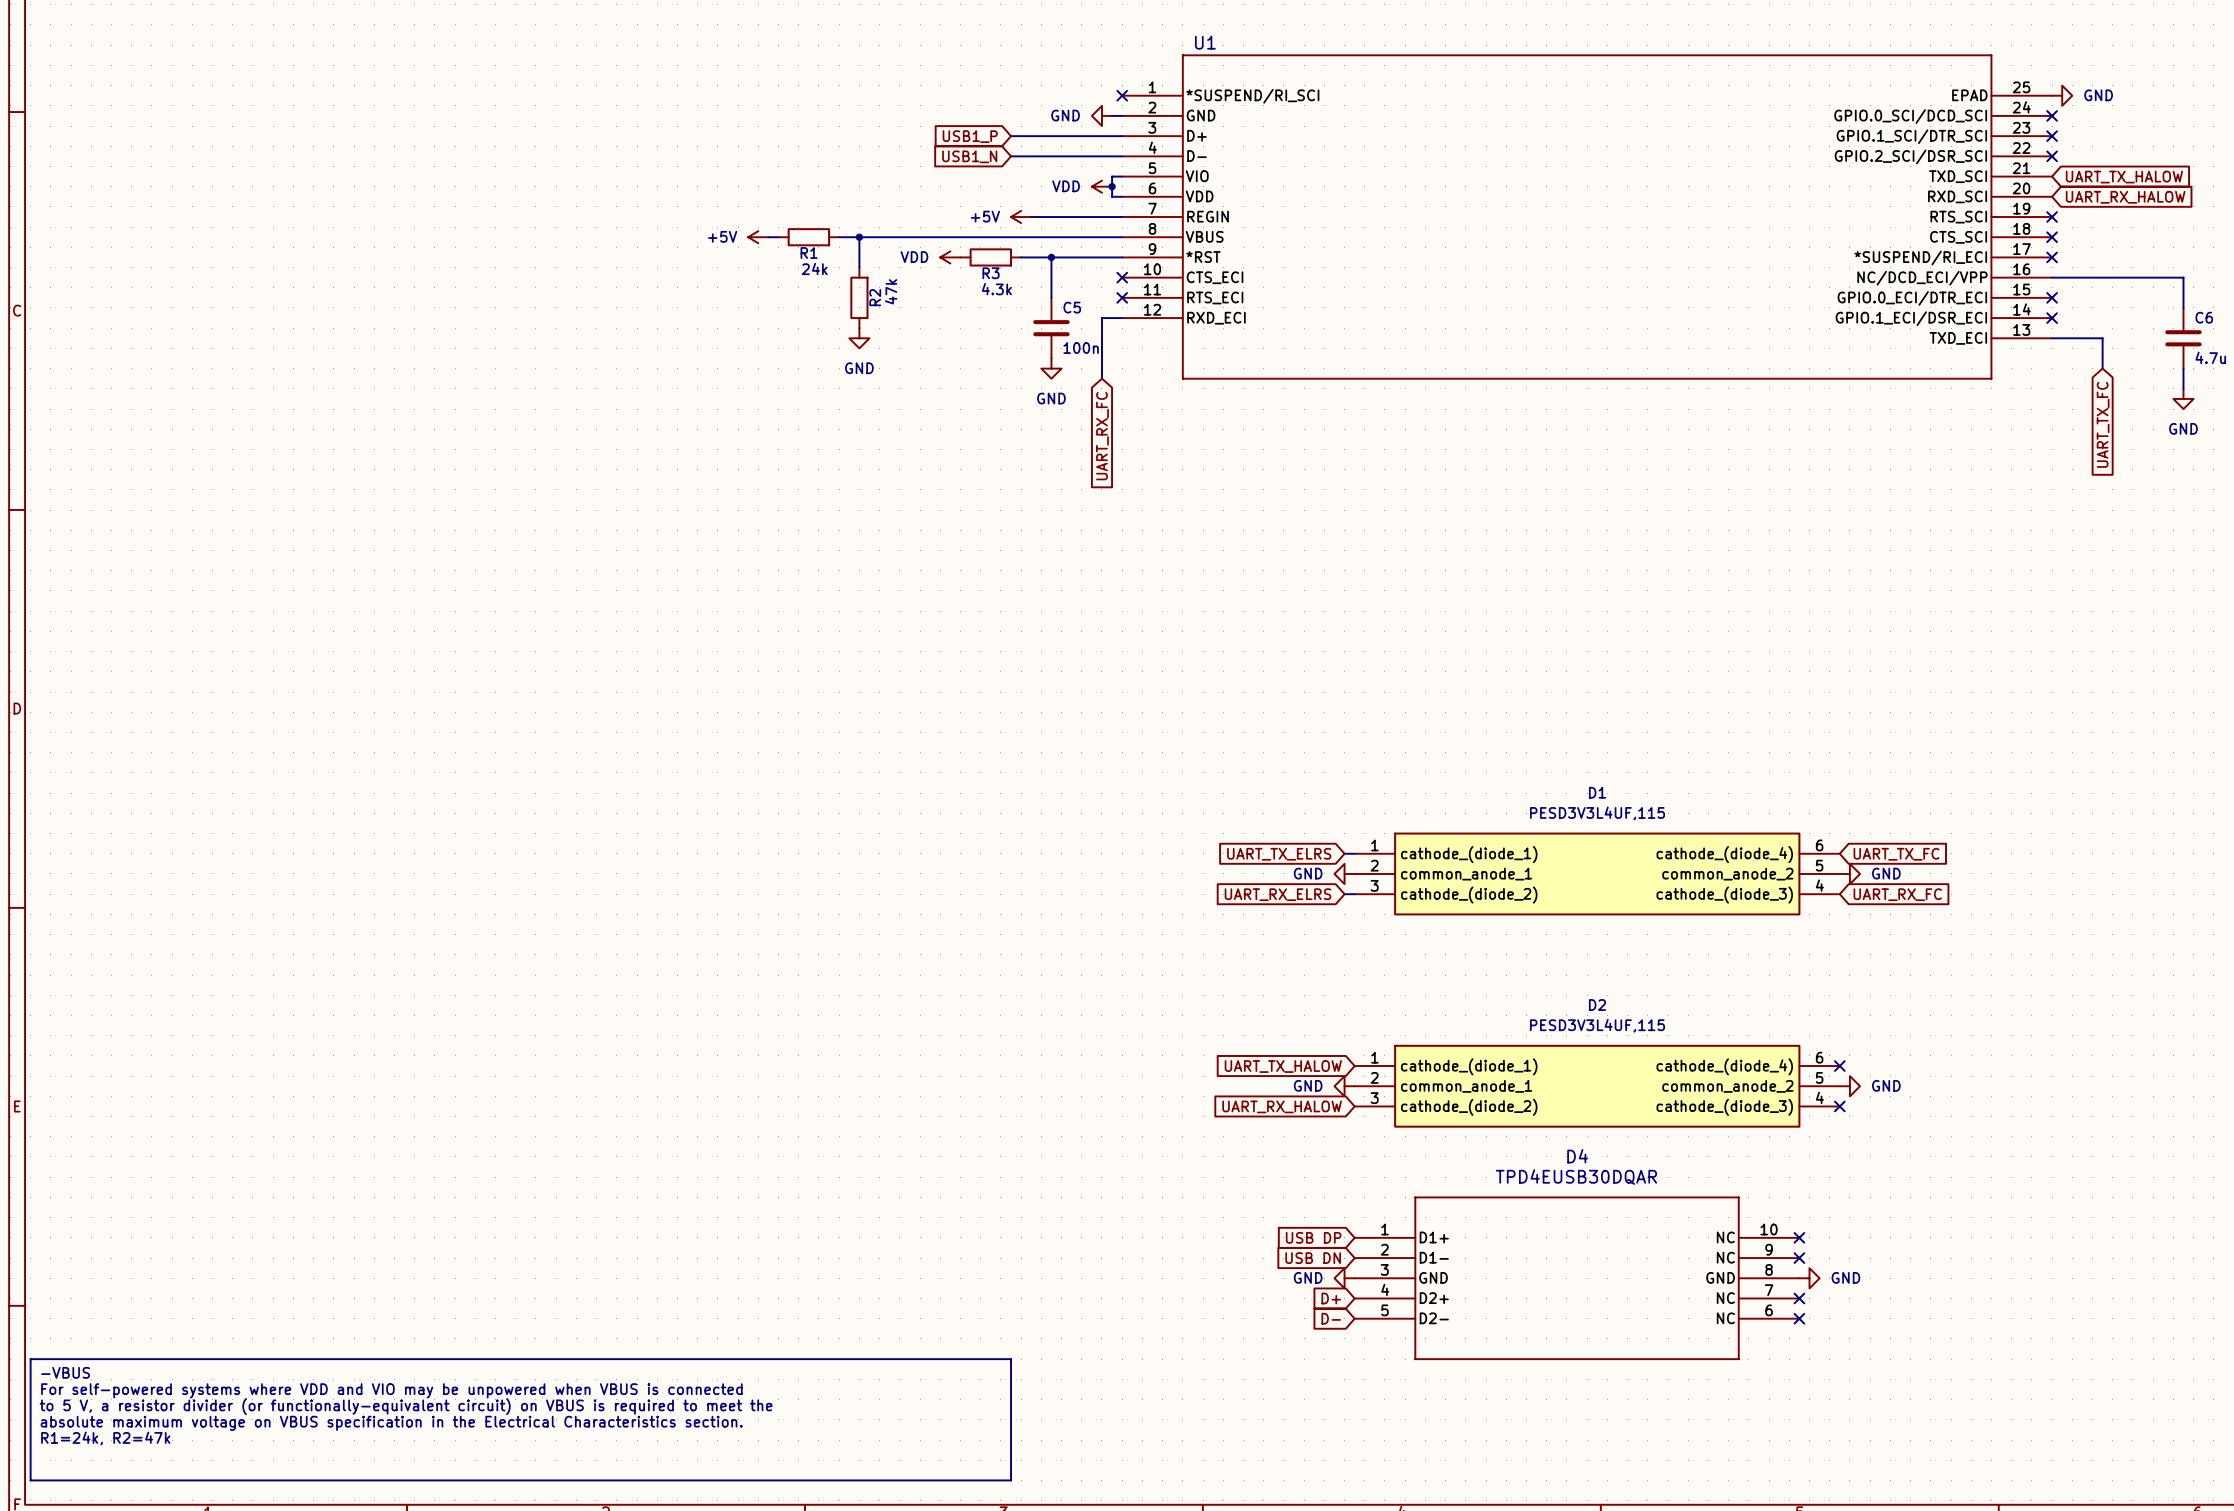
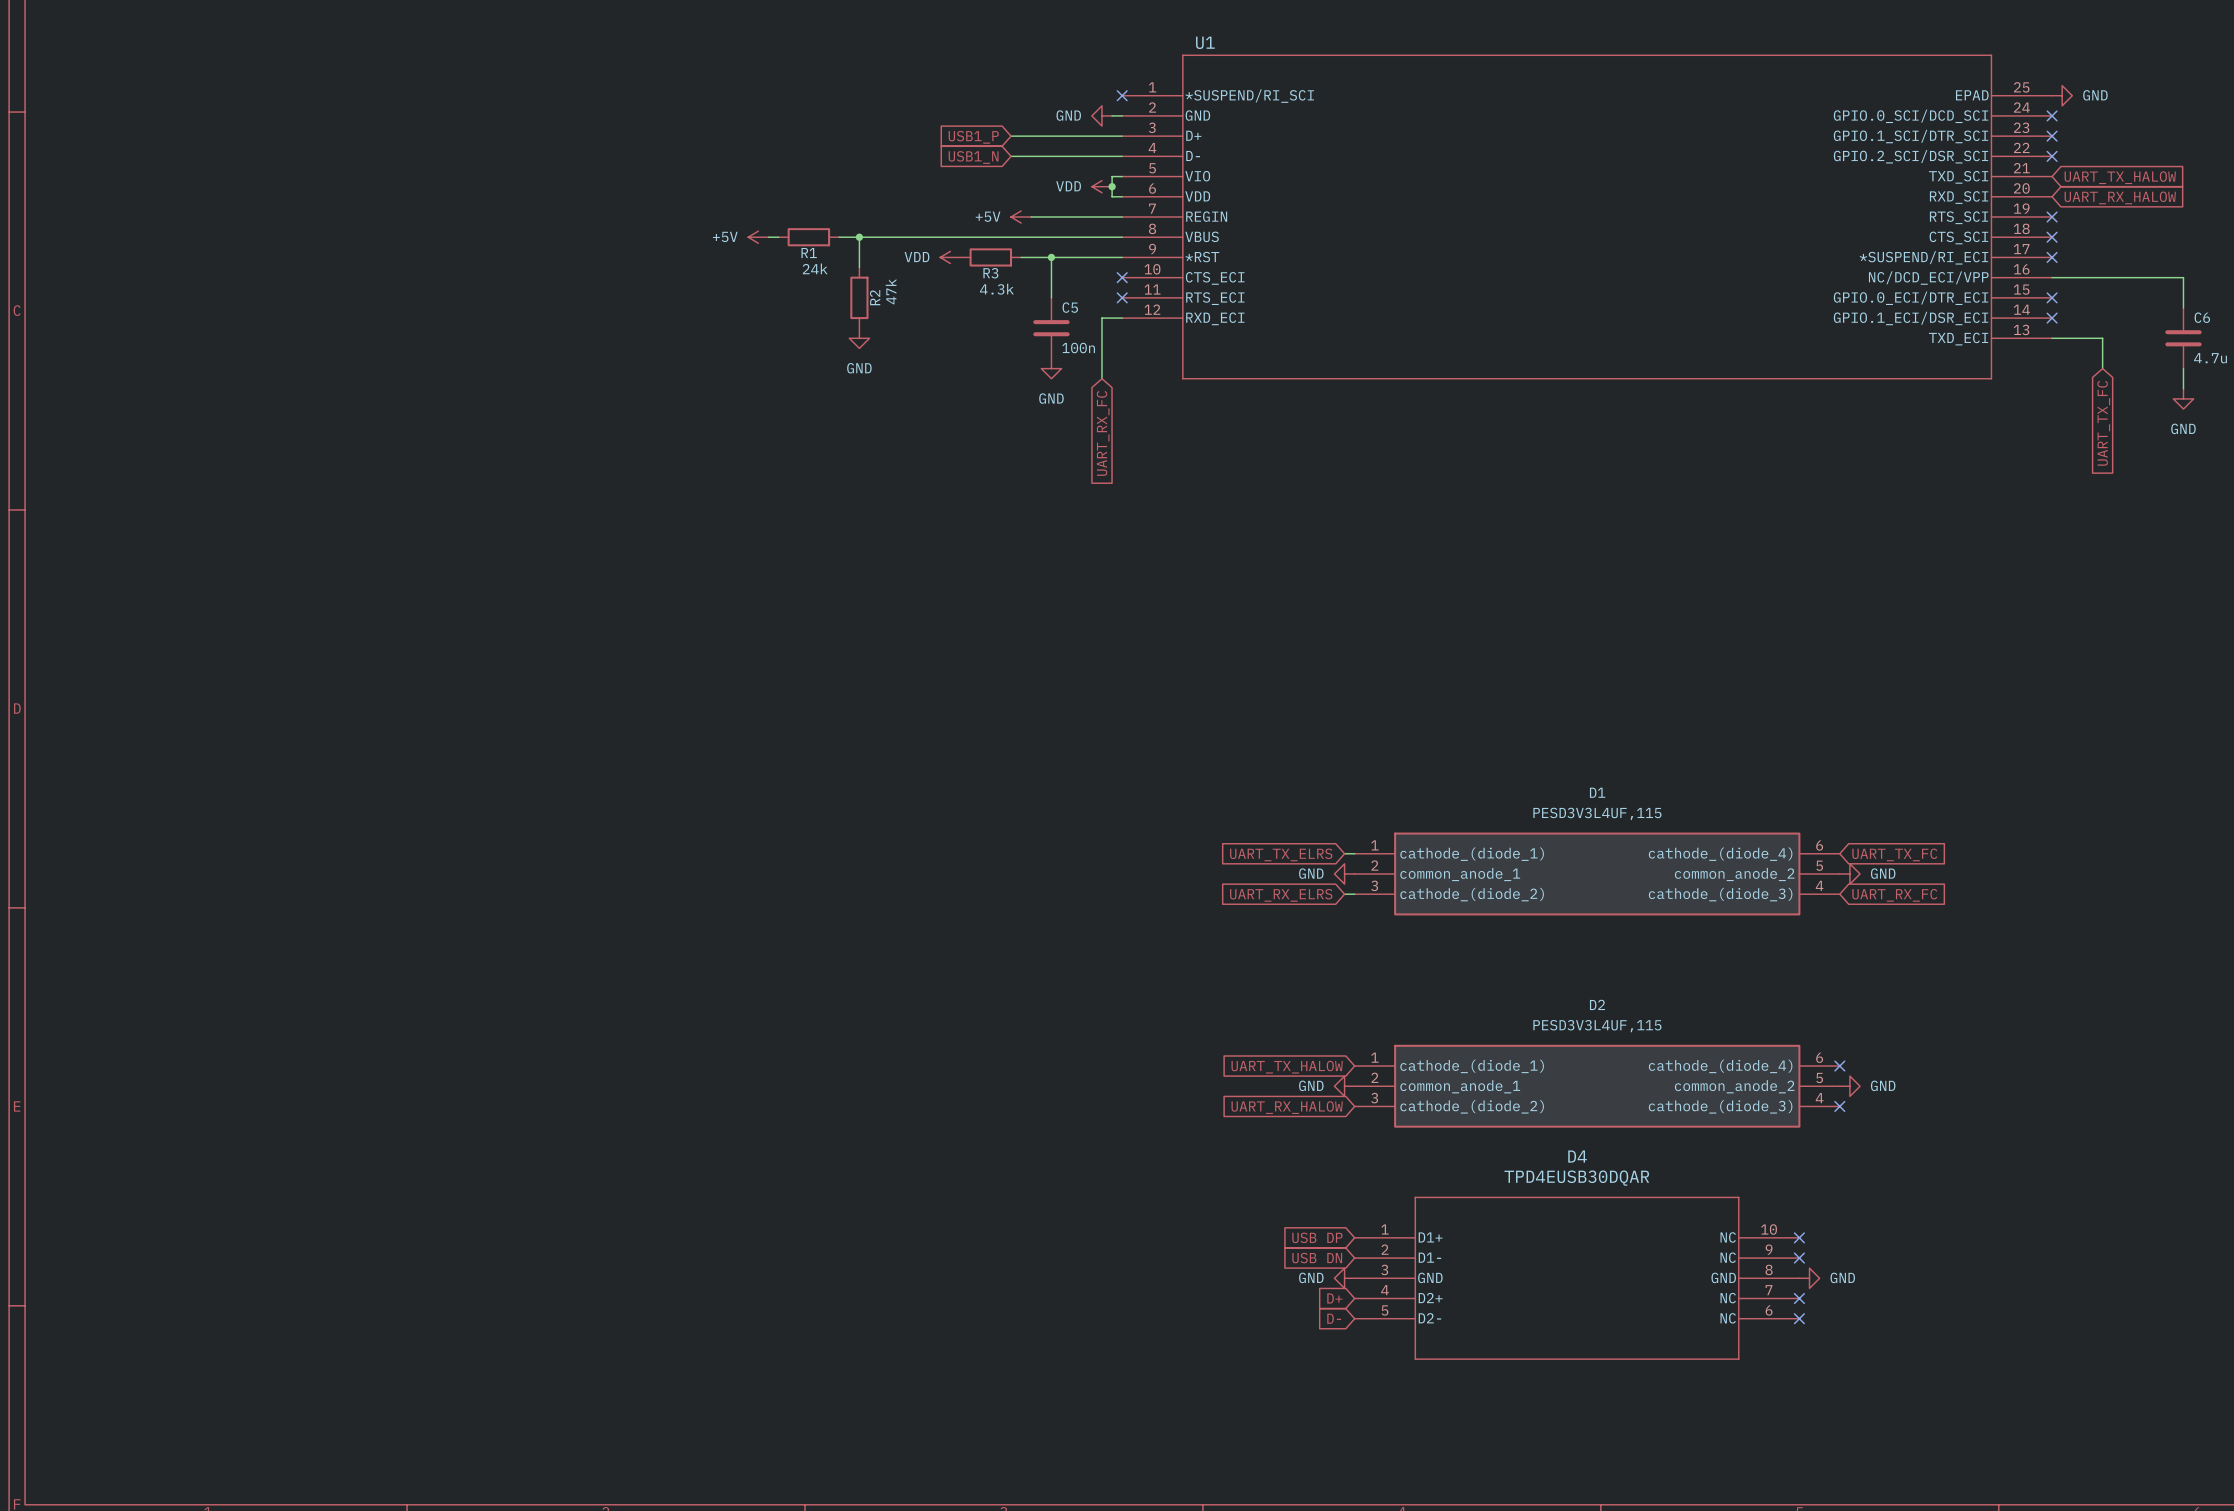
line: (30, 1359) (1011, 1359) (1011, 1480) (30, 1480) (30, 1359) -> none
text: -VBUS (65, 1372) -> none
text: For self-powered systems where VDD and VIO may be unpowered when VBUS is connected (391, 1390) -> none
text: to 5 V, a resistor divider (or functionally-equivalent circuit) on VBUS is required to meet the (406, 1406) -> none
text: absolute maximum voltage on VBUS specification in the Electrical Characteristics section. (391, 1423) -> none
text: R1=24k, R2=47k (105, 1438) -> none

